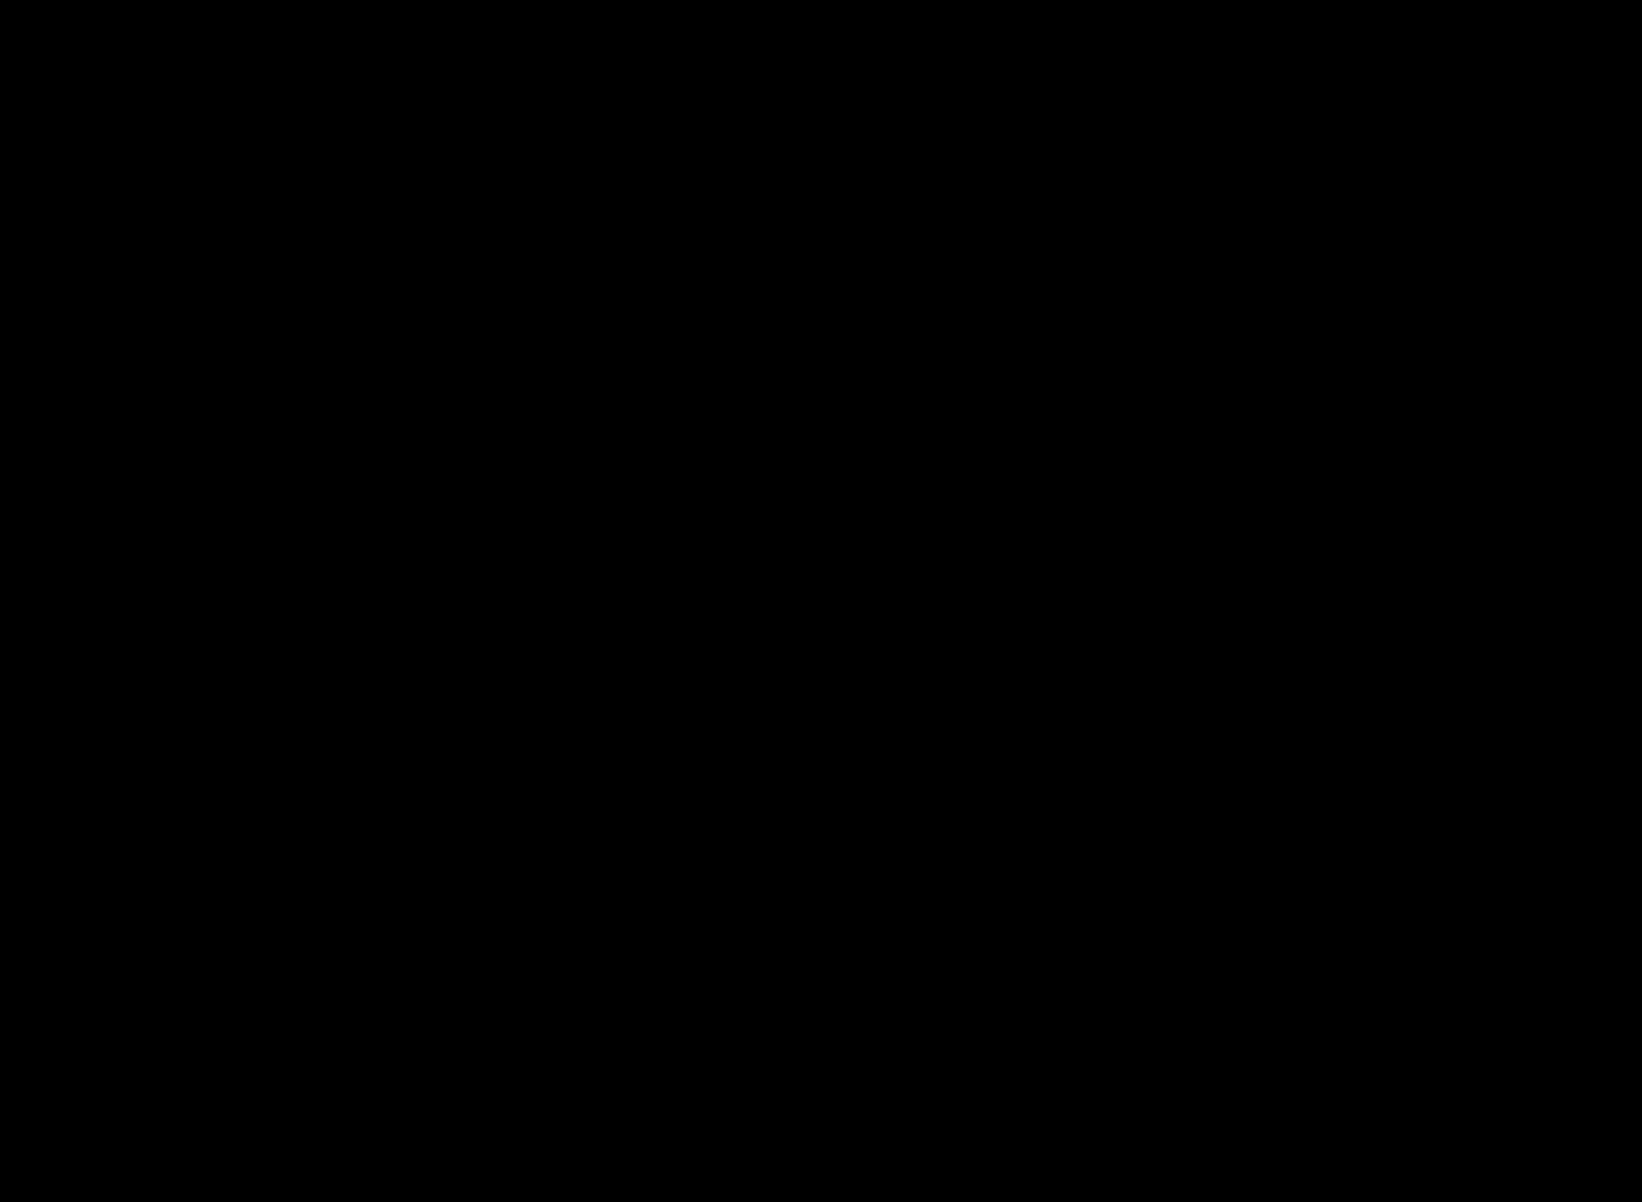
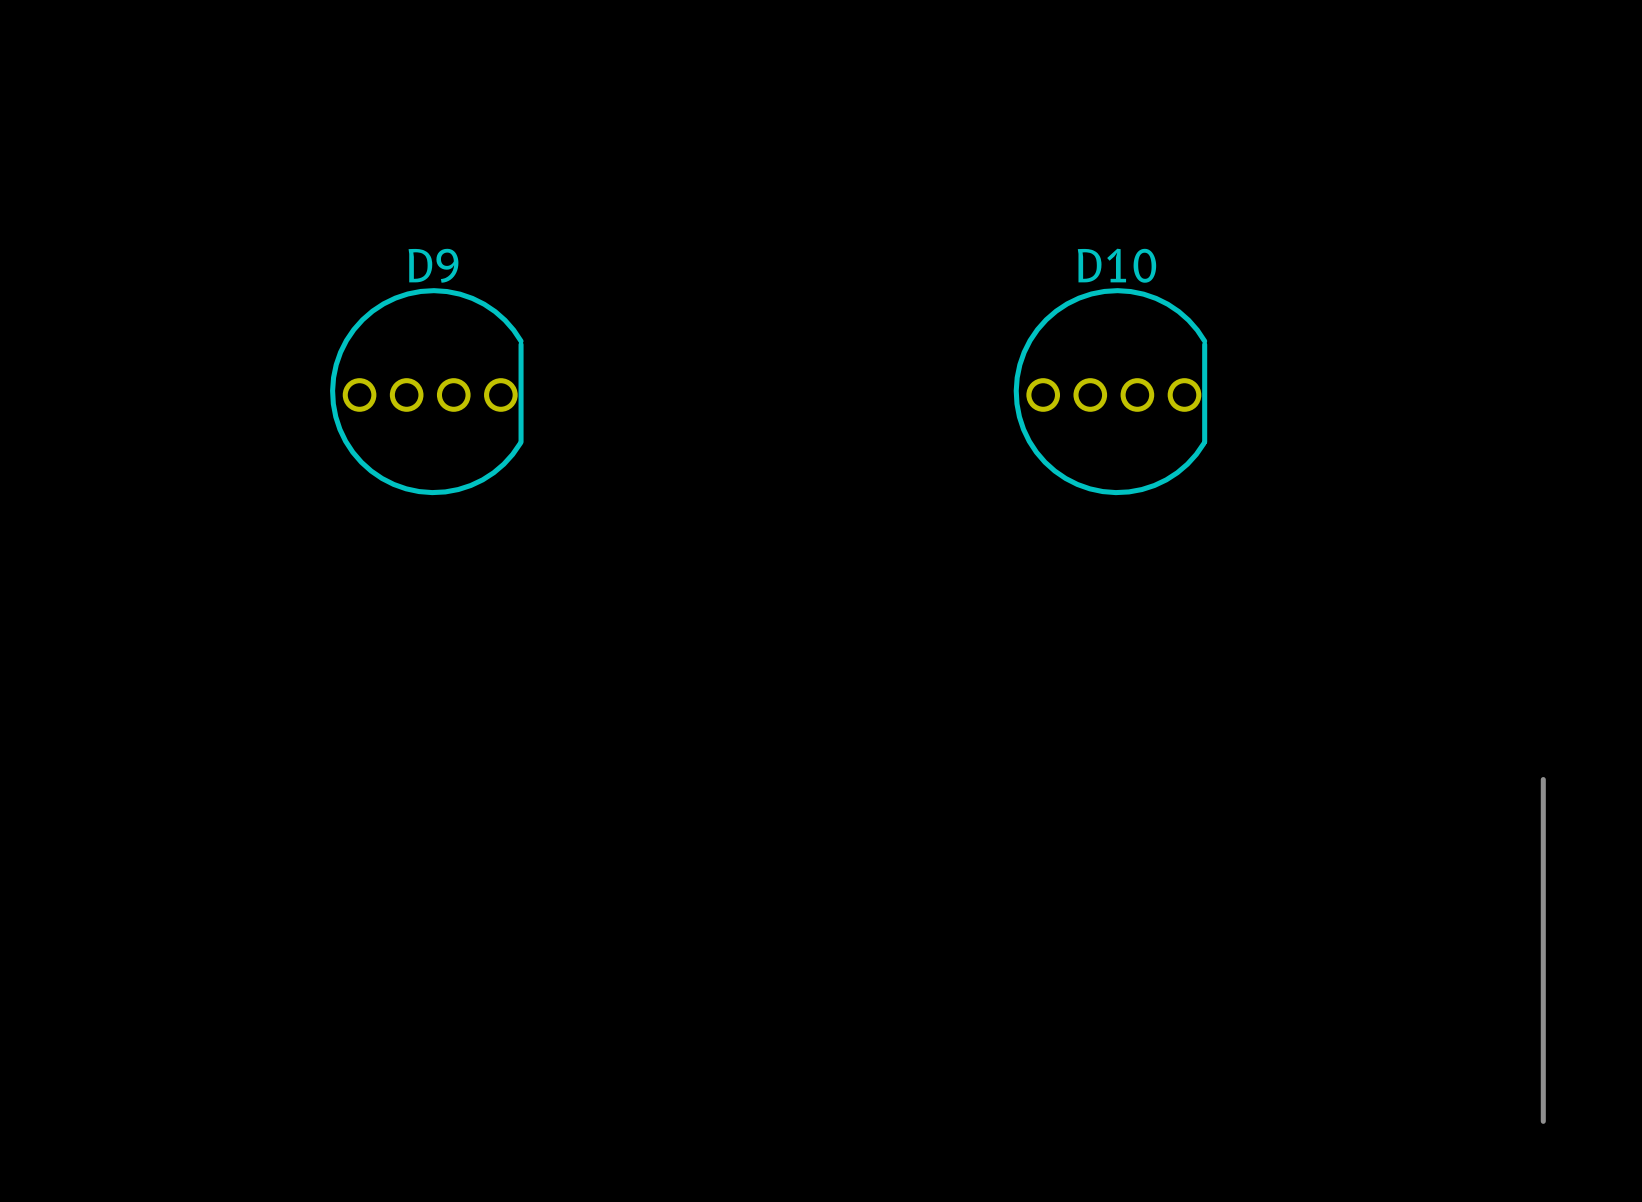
D9: none -> (426, 391)
D10: none -> (1110, 391)
line: none -> (1543, 779) (1543, 1121)

